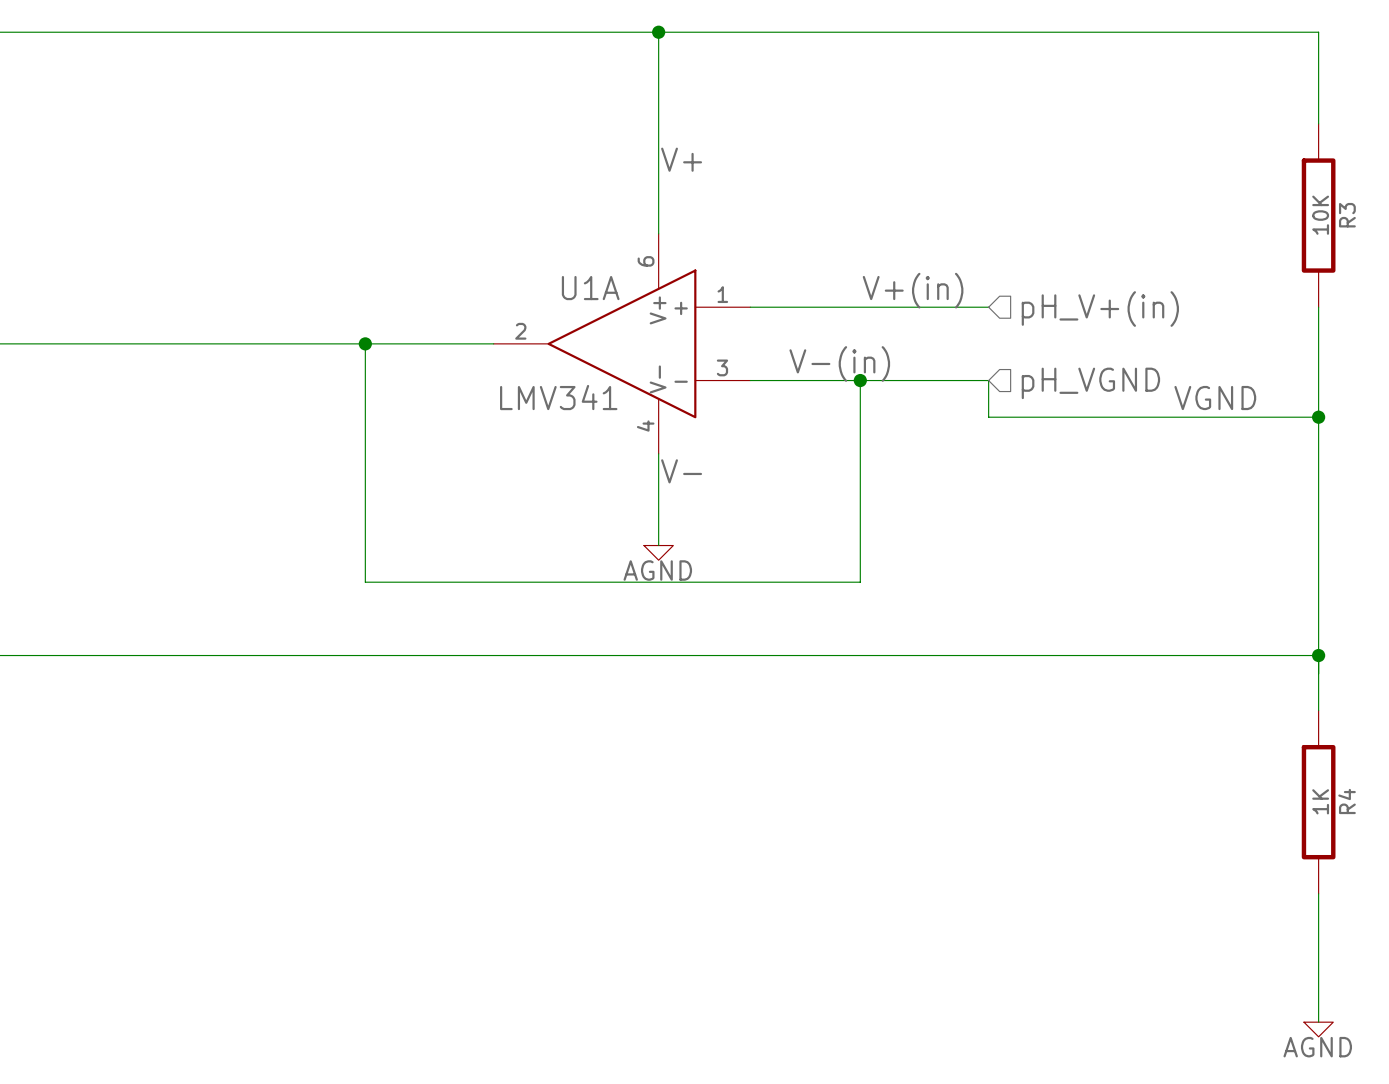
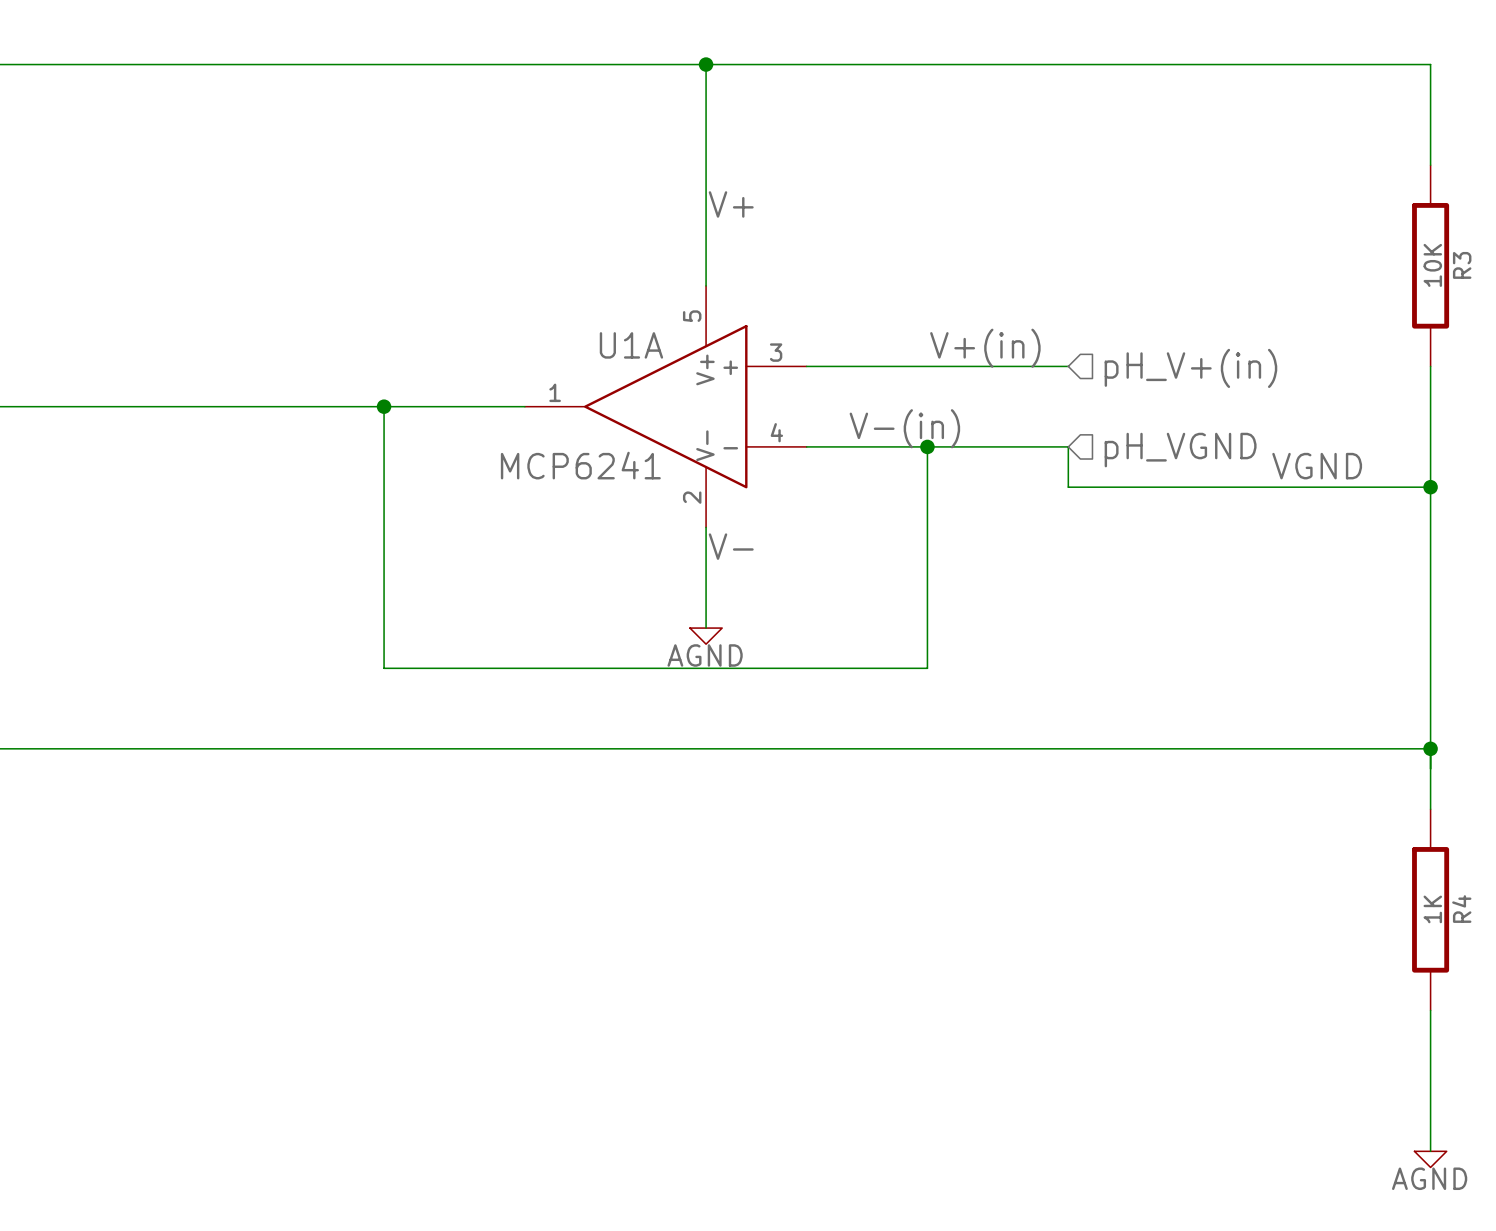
U1A pin number: 6 (646, 261) -> 5 (692, 316)
U1A pin number: 1 (722, 294) -> 3 (776, 352)
U1A pin number: 2 (520, 331) -> 1 (555, 392)
U1A pin number: 3 (722, 367) -> 4 (776, 432)
U1A value: LMV341 (558, 397) -> MCP6241 (580, 465)
U1A pin number: 4 (645, 426) -> 2 (692, 497)

